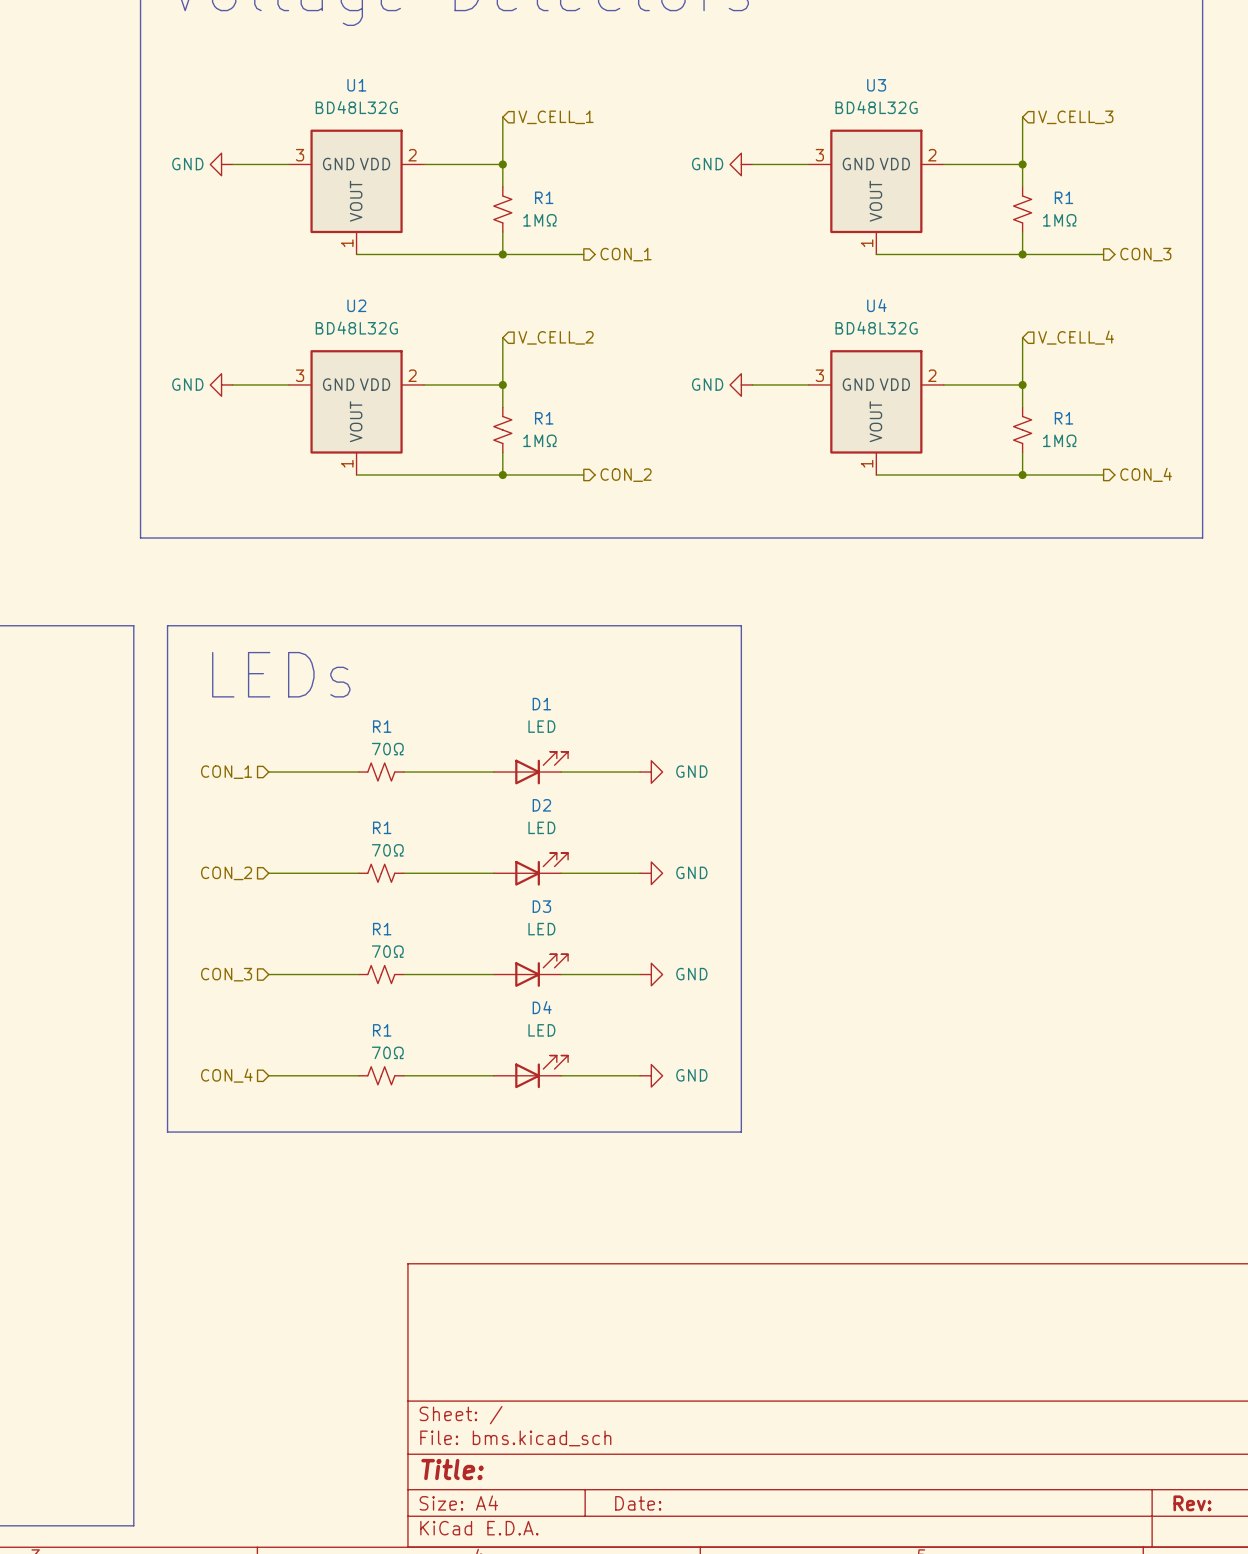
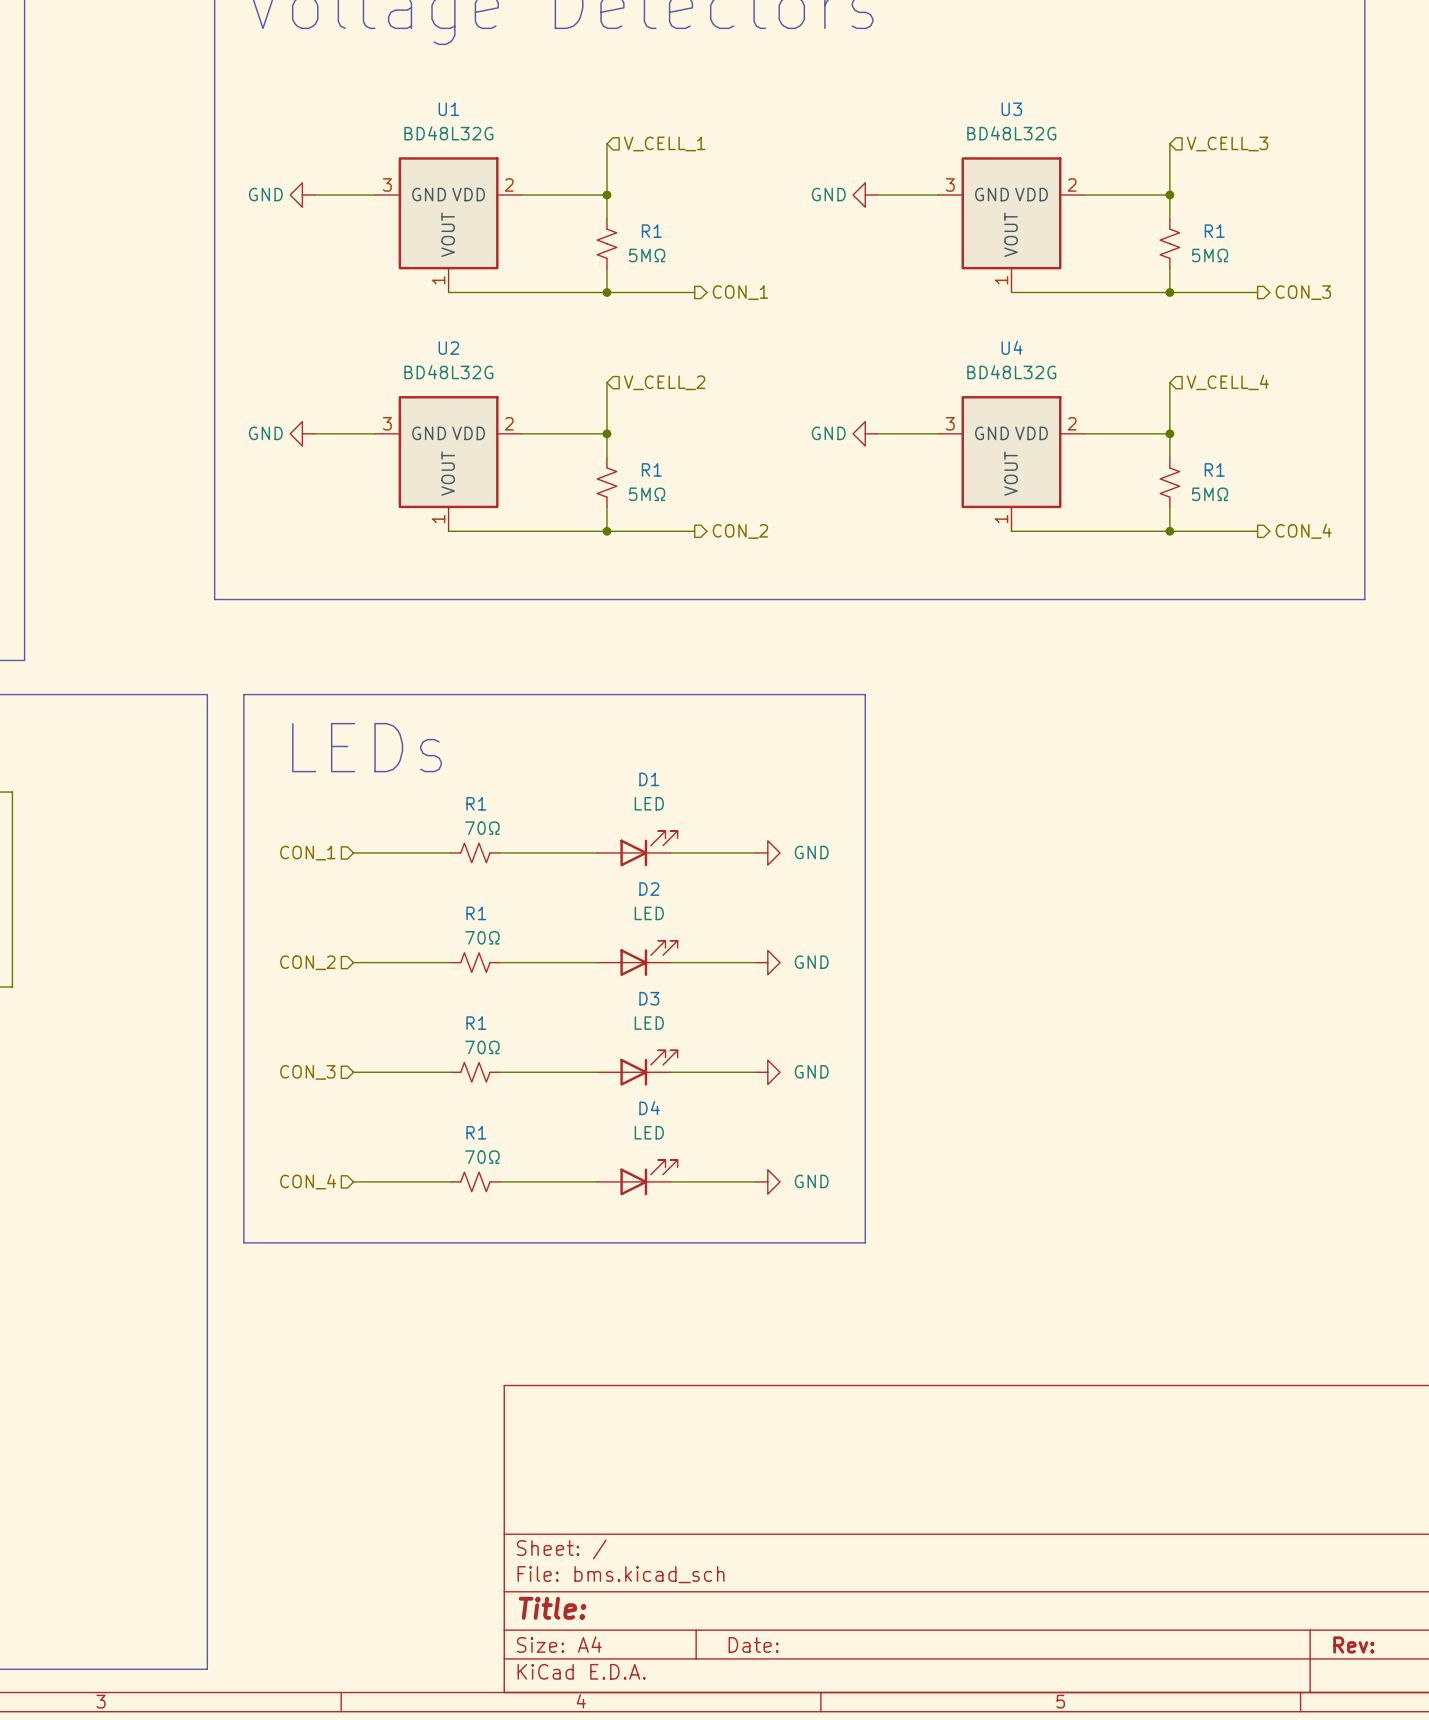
R1 value: 1MΩ (539, 220) -> 5MΩ (647, 255)
R1 value: 1MΩ (1059, 220) -> 5MΩ (1210, 255)
R1 value: 1MΩ (539, 440) -> 5MΩ (647, 494)
R1 value: 1MΩ (1059, 440) -> 5MΩ (1210, 494)

